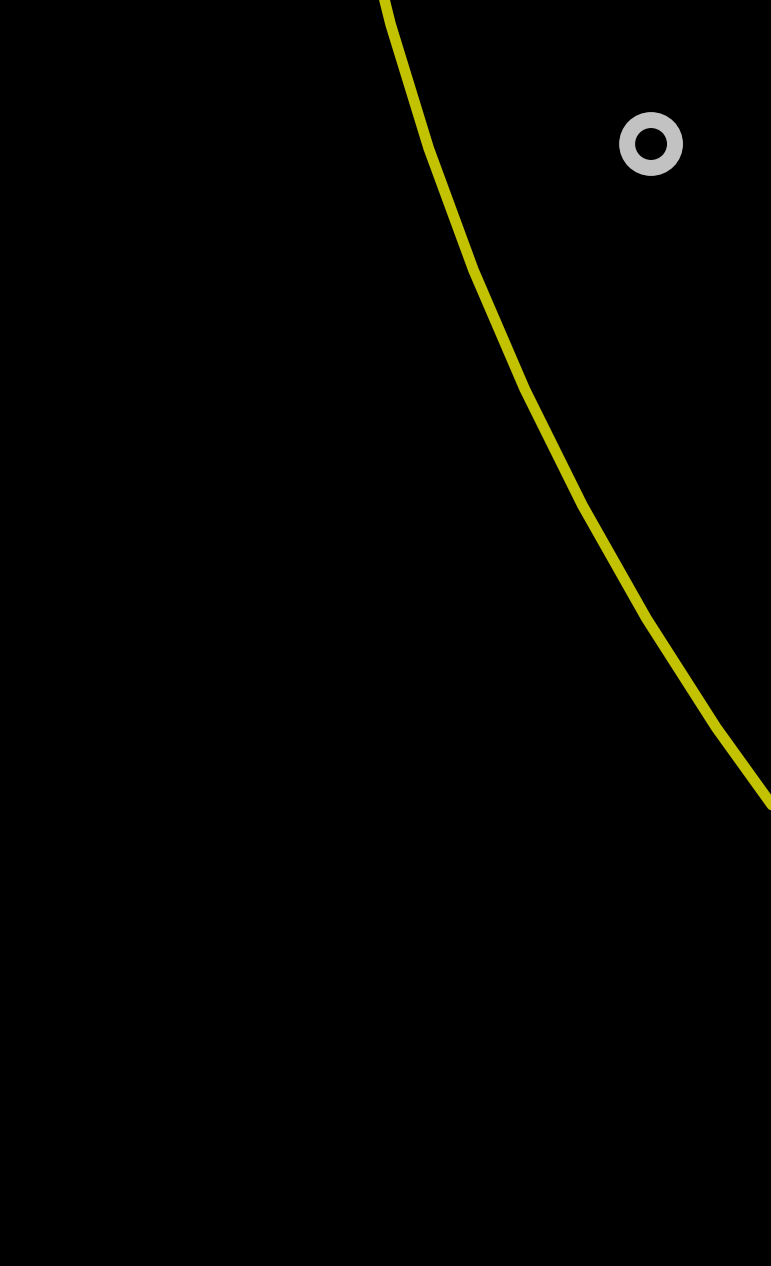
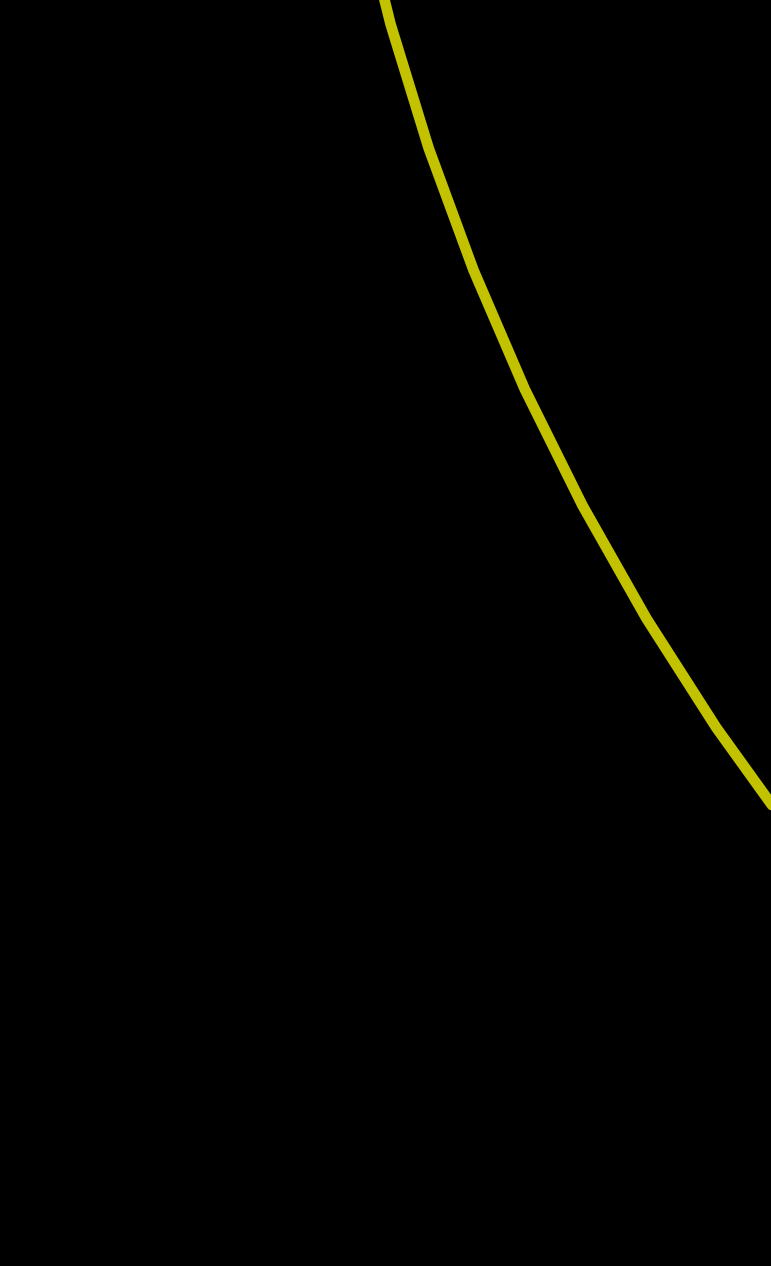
via: (651, 144) -> none

